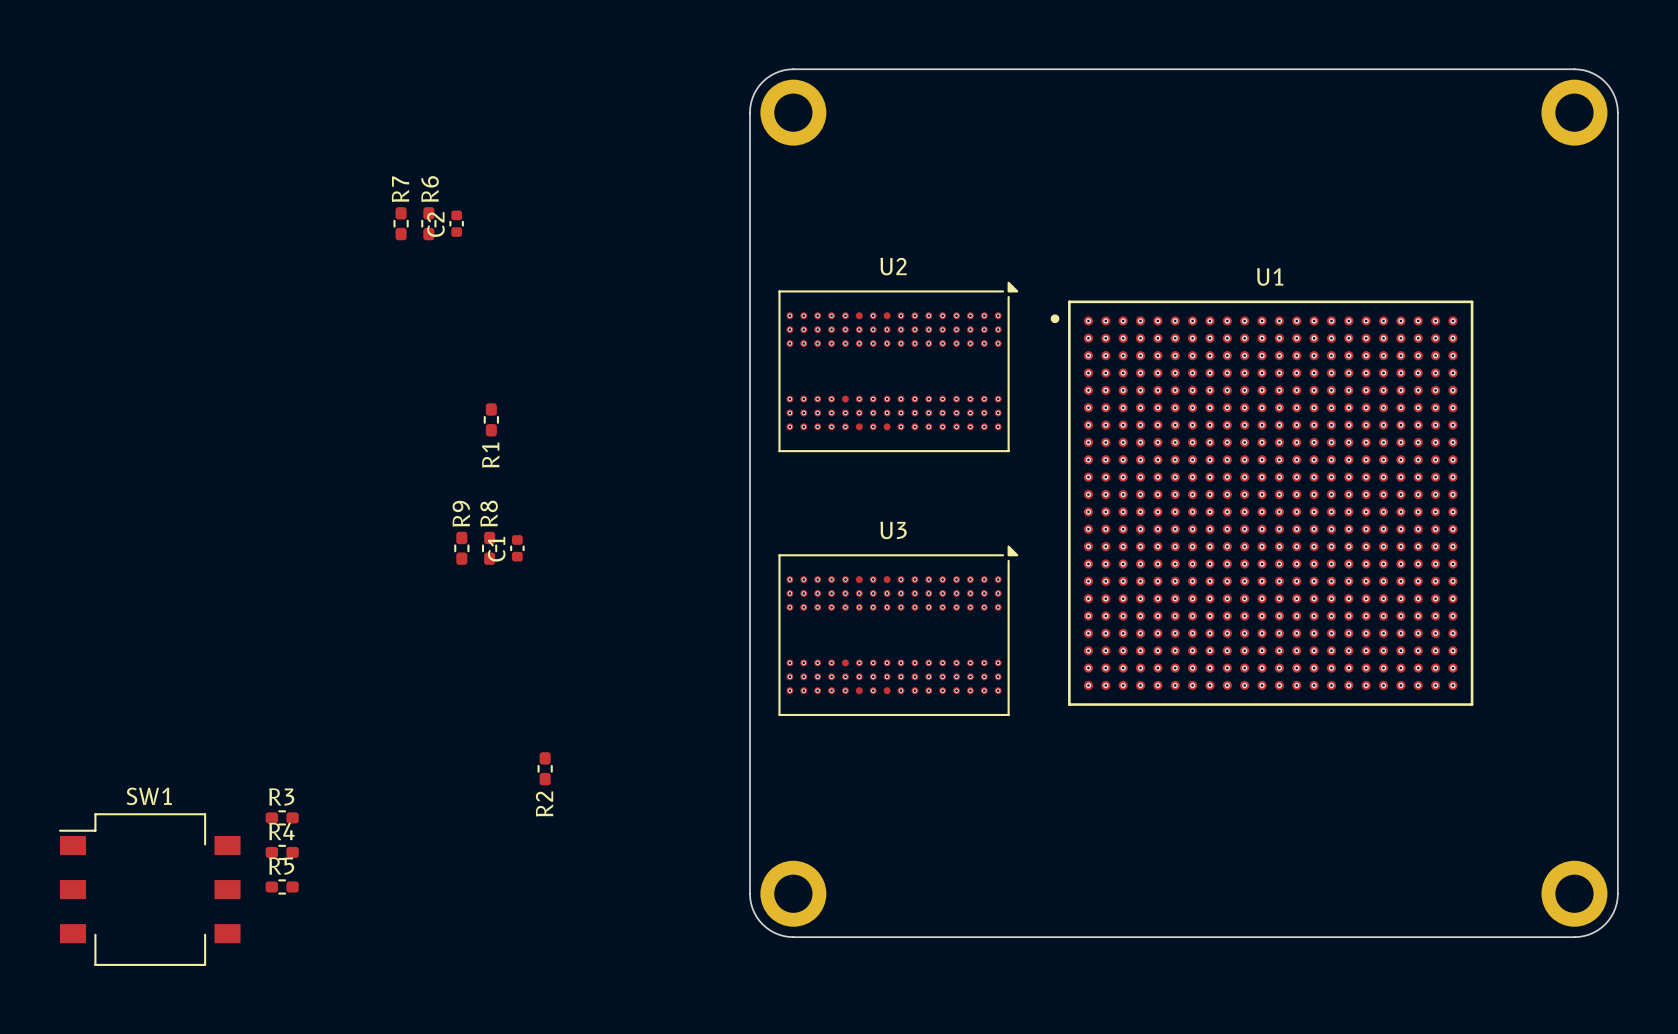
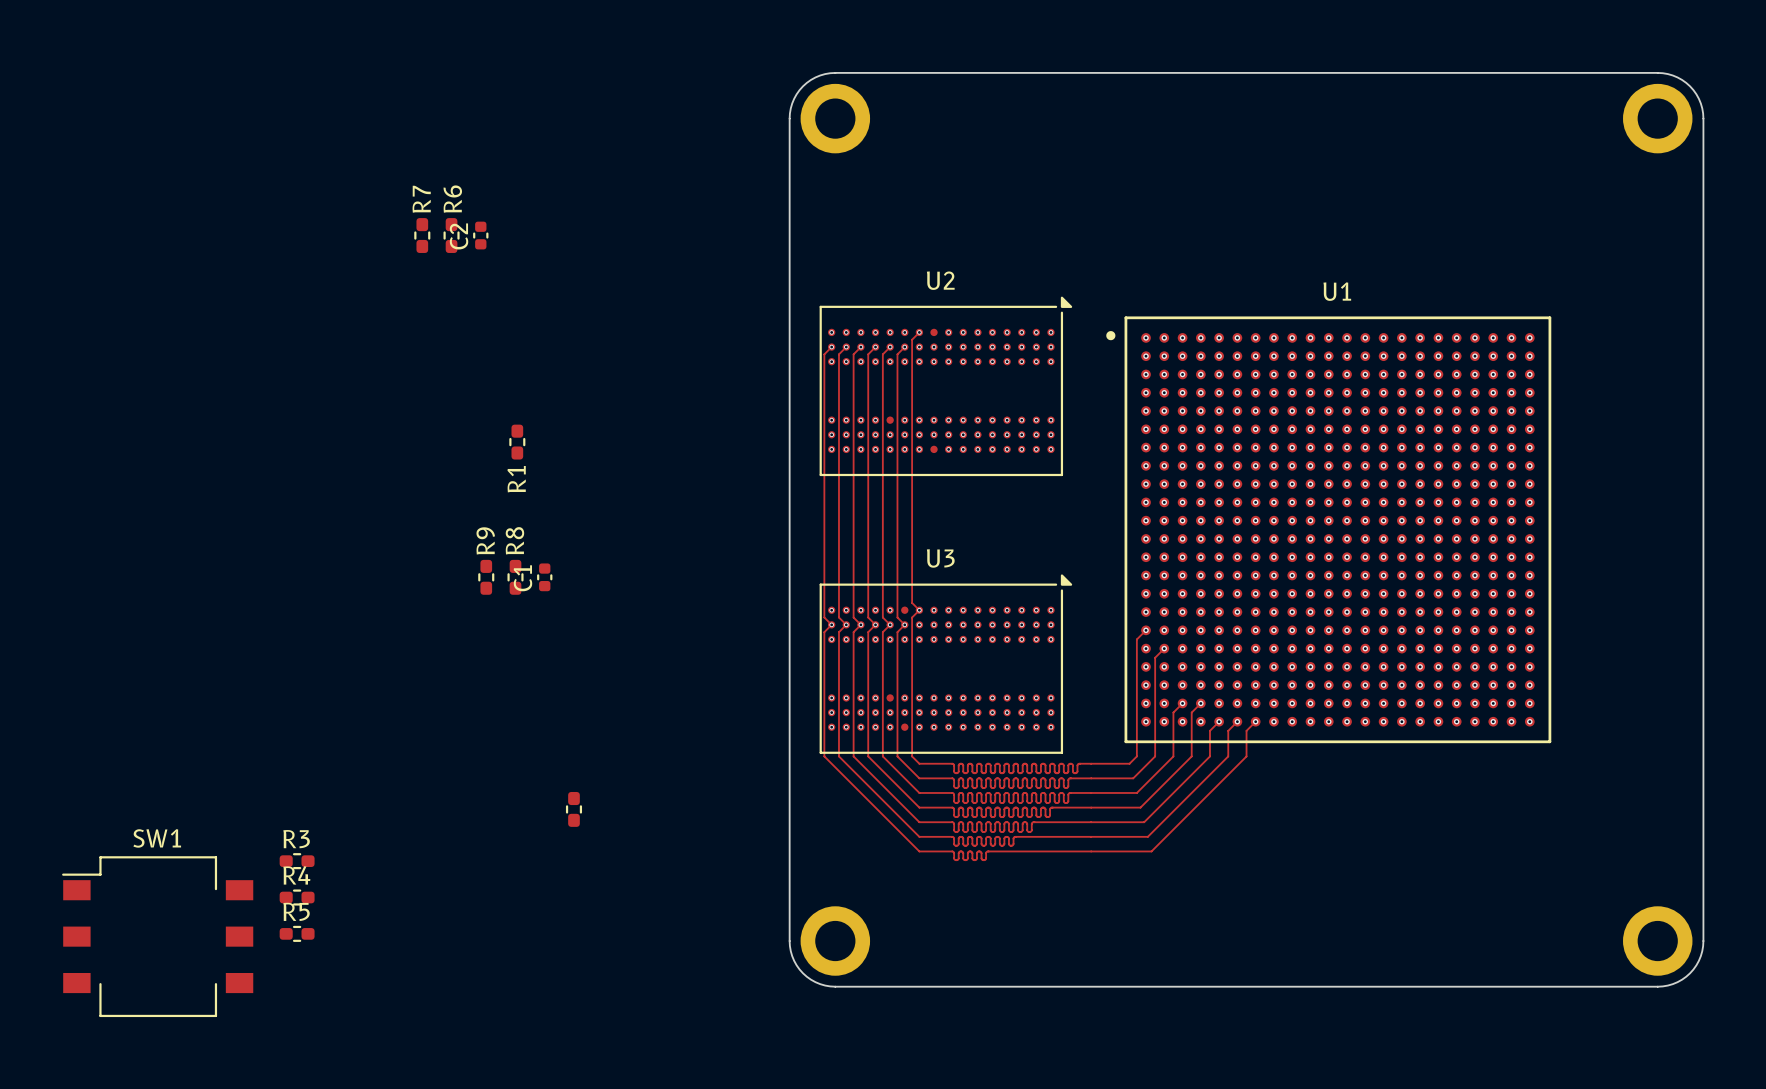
via: none -> (904, 332)
track: none -> (919, 332) (912, 339) (912, 602) (919, 610) (912, 617) (912, 756) (919, 763) (952, 763) (955, 773) (958, 772) (960, 763) (963, 764) (965, 773) (967, 772) (969, 763) (972, 764) (974, 773) (976, 771) (977, 764) (980, 764) (981, 771) (984, 773) (986, 764) (989, 763) (992, 773) (995, 772) (996, 763) (999, 764) (1001, 773) (1004, 772) (1005, 763) (1008, 764) (1010, 773) (1013, 771) (1014, 764) (1017, 764) (1018, 771) (1020, 773) (1022, 764) (1026, 763) (1027, 772) (1029, 773) (1031, 764) (1034, 763) (1036, 772) (1039, 773) (1041, 764) (1044, 763) (1045, 772) (1048, 773) (1050, 764) (1053, 763) (1054, 772) (1057, 773) (1059, 764) (1062, 763) (1063, 772) (1066, 773) (1068, 764) (1071, 763) (1073, 772) (1075, 773) (1078, 763) (1129, 763) (1136, 756) (1136, 639) (1146, 630)
track: none -> (831, 347) (824, 354) (824, 617) (831, 624) (824, 632) (824, 756) (919, 851) (952, 851) (955, 860) (958, 859) (960, 851) (963, 852) (965, 860) (967, 859) (969, 851) (972, 852) (974, 860) (976, 859) (978, 851) (981, 852) (983, 860) (985, 859) (987, 851) (1151, 851) (1246, 756) (1246, 730) (1255, 721)
track: none -> (846, 347) (838, 354) (838, 617) (846, 624) (838, 632) (838, 756) (919, 836) (952, 836) (955, 845) (958, 844) (960, 836) (963, 837) (965, 845) (967, 844) (969, 836) (972, 837) (974, 845) (976, 844) (978, 836) (981, 837) (983, 845) (985, 844) (987, 836) (990, 837) (992, 845) (995, 844) (996, 836) (999, 837) (1001, 845) (1004, 844) (1004, 837) (1008, 837) (1009, 844) (1011, 845) (1015, 836) (1147, 836) (1228, 756) (1228, 730) (1237, 721)
track: none -> (860, 347) (853, 354) (853, 617) (860, 624) (853, 632) (853, 756) (919, 822) (952, 822) (955, 831) (958, 830) (960, 822) (963, 823) (965, 831) (967, 830) (969, 822) (972, 823) (974, 831) (976, 830) (978, 822) (981, 823) (983, 831) (985, 830) (987, 822) (990, 823) (992, 831) (995, 830) (996, 822) (999, 823) (999, 830) (1002, 831) (1004, 823) (1007, 822) (1009, 830) (1011, 831) (1014, 822) (1017, 823) (1018, 830) (1020, 831) (1022, 823) (1025, 822) (1027, 830) (1029, 831) (1033, 822) (1144, 822) (1209, 756) (1209, 730) (1219, 721)
track: none -> (875, 347) (868, 354) (868, 617) (875, 624) (868, 632) (868, 756) (919, 807) (952, 807) (955, 817) (958, 816) (960, 807) (963, 808) (965, 817) (967, 816) (969, 807) (972, 808) (974, 817) (976, 815) (977, 807) (981, 808) (981, 815) (984, 817) (986, 808) (989, 807) (992, 817) (995, 816) (996, 807) (999, 808) (1001, 817) (1004, 816) (1005, 807) (1008, 808) (1010, 817) (1013, 816) (1014, 807) (1017, 808) (1019, 817) (1022, 815) (1023, 807) (1026, 808) (1027, 815) (1029, 817) (1031, 808) (1035, 807) (1036, 816) (1039, 817) (1041, 808) (1044, 807) (1045, 816) (1048, 817) (1051, 807) (1140, 807) (1191, 756) (1191, 712) (1200, 703)
track: none -> (890, 347) (882, 354) (882, 617) (890, 624) (882, 632) (882, 756) (919, 792) (952, 793) (955, 802) (958, 801) (960, 792) (963, 794) (965, 802) (967, 801) (969, 792) (972, 794) (974, 802) (976, 801) (978, 793) (981, 794) (983, 802) (986, 801) (987, 793) (990, 794) (992, 802) (995, 801) (995, 793) (998, 793) (999, 801) (1002, 802) (1004, 794) (1007, 793) (1009, 801) (1011, 802) (1013, 794) (1016, 793) (1018, 801) (1020, 802) (1022, 794) (1025, 792) (1027, 801) (1029, 802) (1031, 794) (1034, 792) (1036, 801) (1039, 802) (1041, 794) (1043, 792) (1045, 801) (1048, 802) (1050, 794) (1053, 792) (1054, 801) (1057, 802) (1059, 794) (1062, 792) (1063, 801) (1066, 802) (1069, 792) (1136, 792) (1173, 756) (1173, 712) (1182, 703)
track: none -> (904, 347) (897, 354) (897, 617) (904, 624) (897, 632) (897, 756) (919, 778) (952, 778) (955, 787) (958, 786) (960, 778) (963, 779) (965, 787) (967, 786) (969, 778) (972, 779) (974, 787) (976, 786) (978, 778) (981, 779) (983, 787) (986, 786) (986, 779) (989, 778) (990, 786) (993, 787) (996, 778) (999, 779) (1001, 787) (1004, 786) (1005, 778) (1008, 779) (1010, 787) (1013, 786) (1014, 778) (1017, 779) (1018, 786) (1020, 787) (1022, 779) (1026, 778) (1027, 786) (1029, 787) (1031, 779) (1034, 778) (1036, 786) (1039, 787) (1041, 779) (1043, 778) (1045, 786) (1048, 787) (1050, 778) (1054, 779) (1054, 786) (1057, 787) (1059, 779) (1062, 778) (1063, 786) (1066, 787) (1069, 778) (1133, 778) (1155, 756) (1155, 657) (1164, 648)
via: none -> (904, 449)
via: none -> (934, 610)
via: none -> (934, 727)
R2 name: R2 (544, 804) -> none

